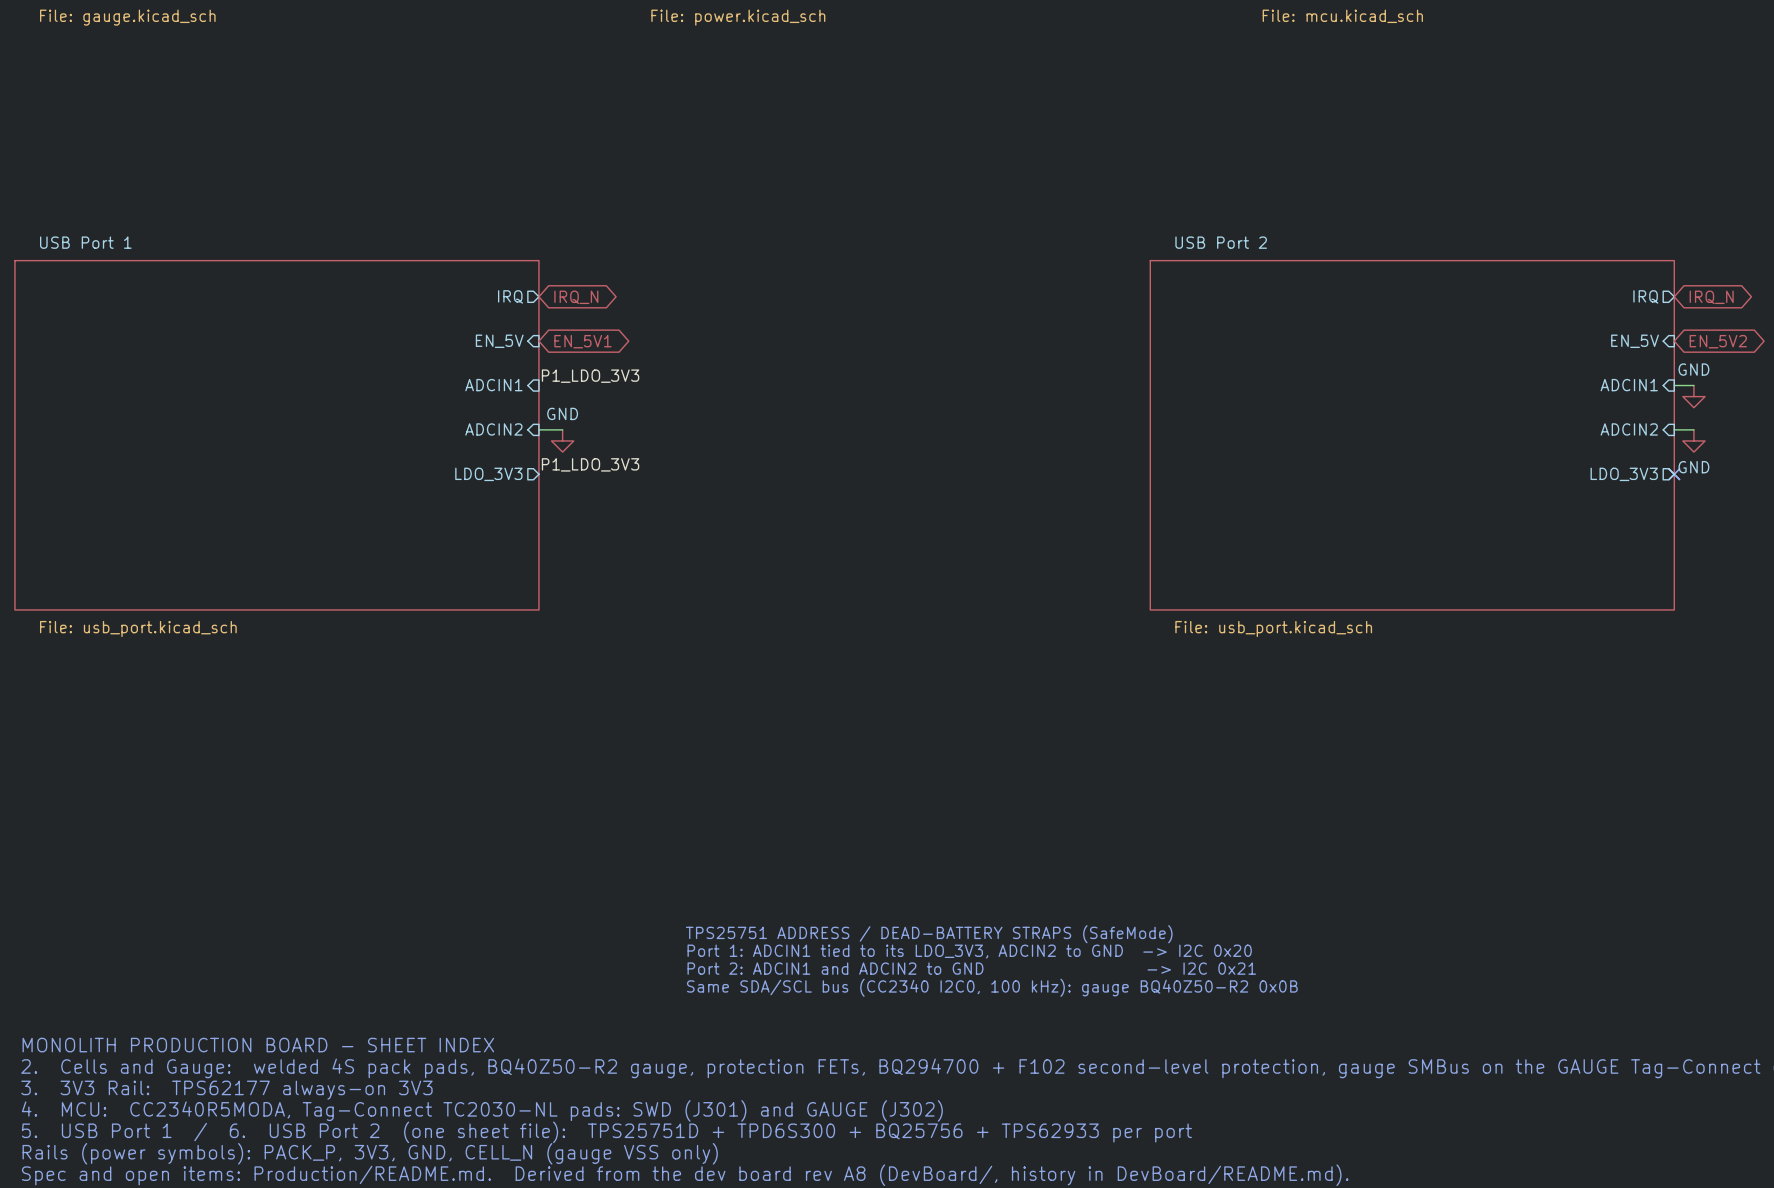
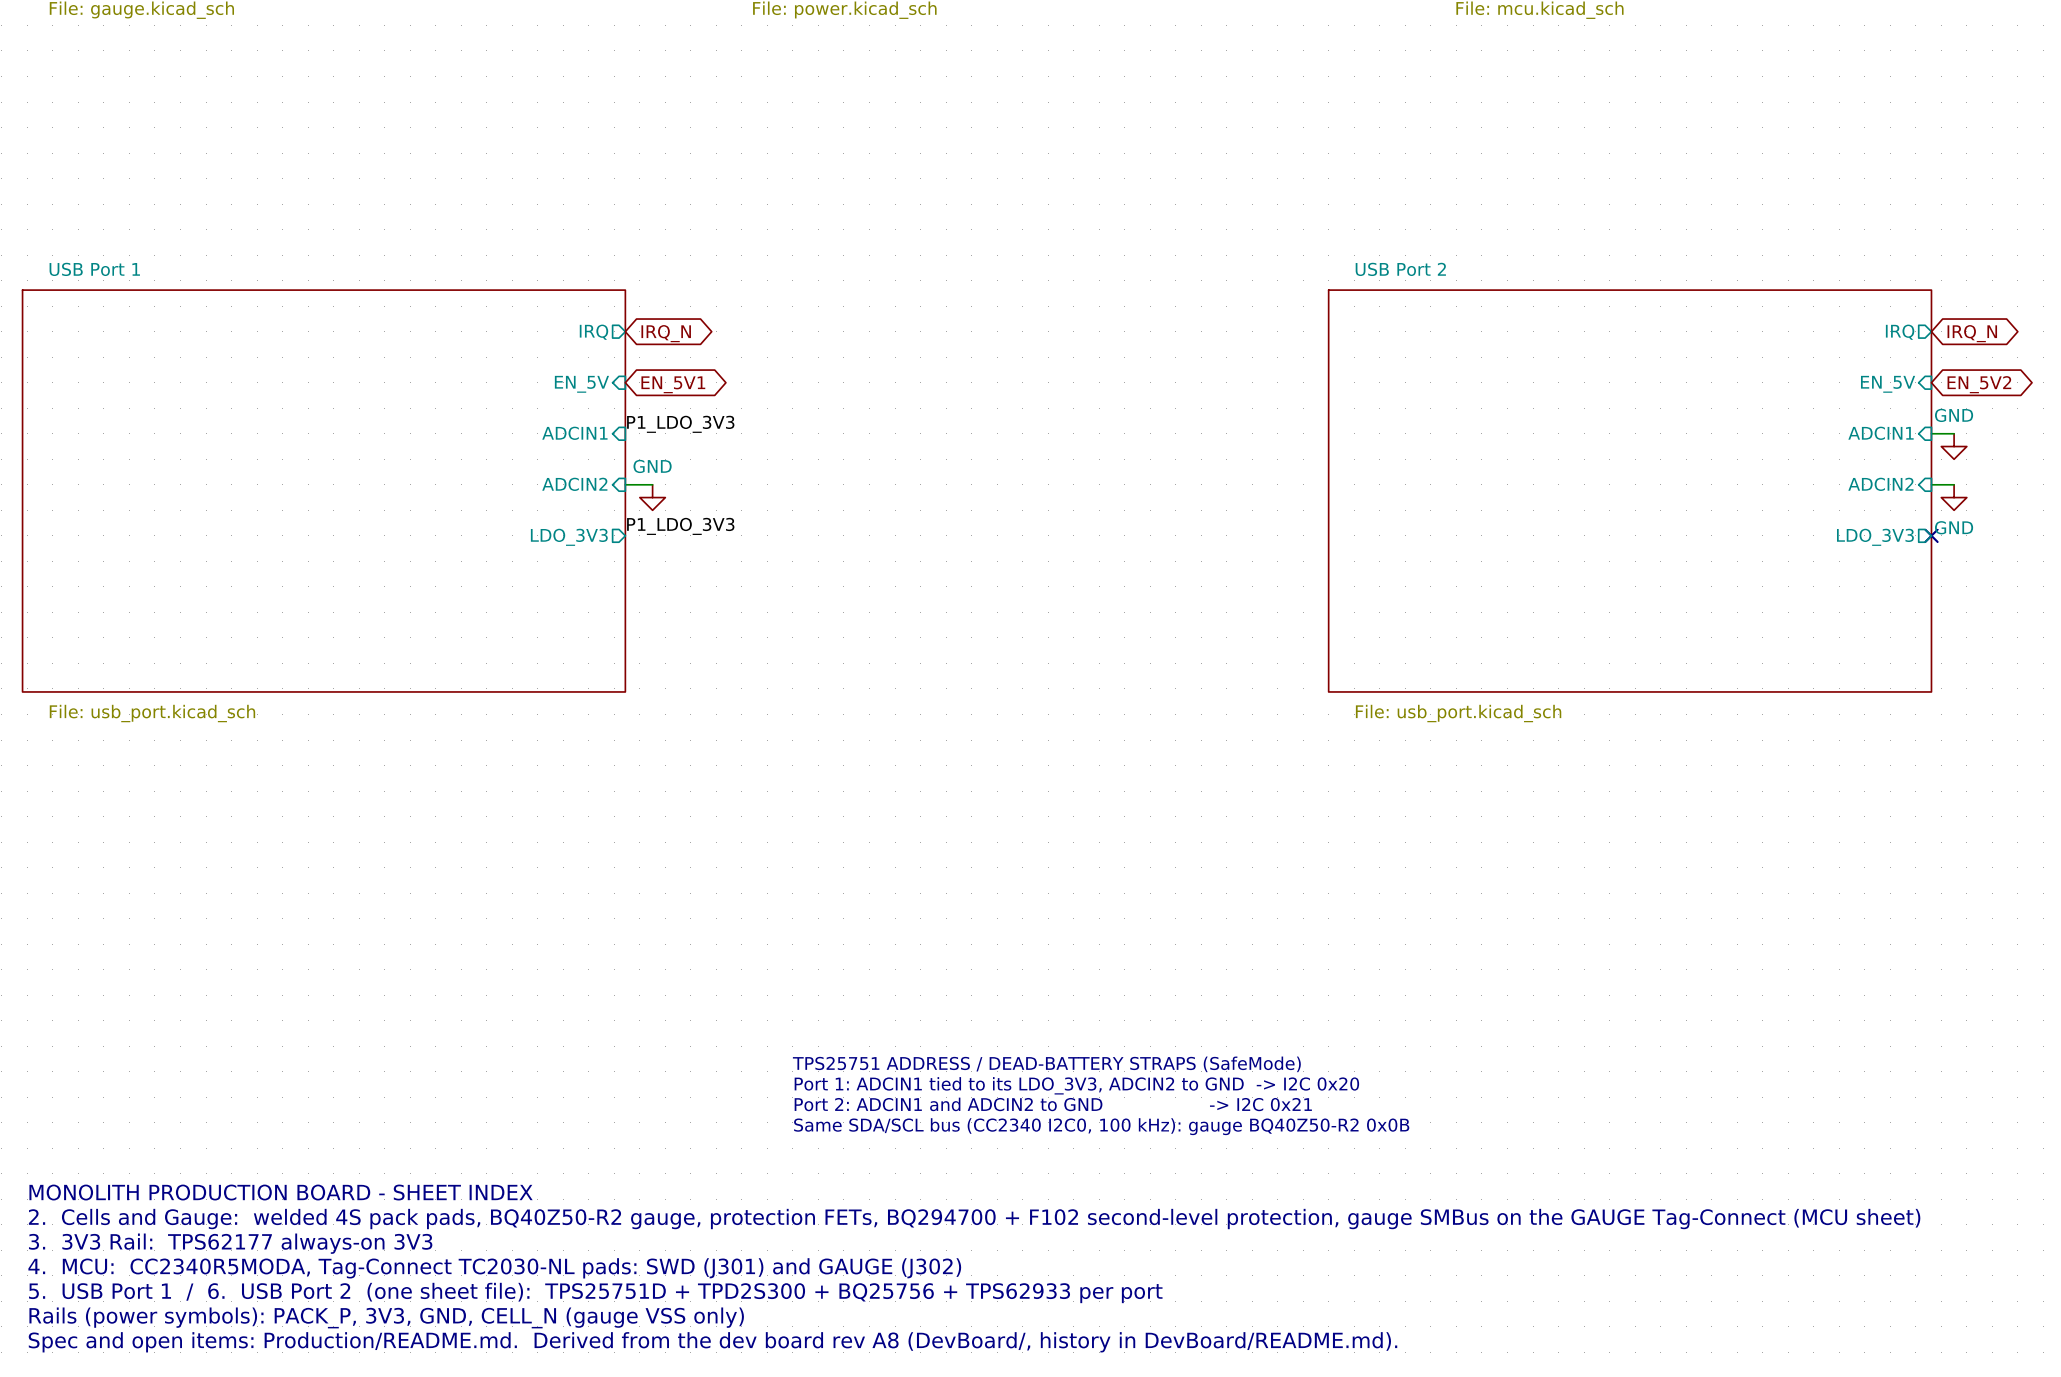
text: 5. USB Port 1 / 6. USB Port 2 (one sheet file): TPS25751D + TPD6S300 + BQ25756 + TPS62933 per port (606, 1132) -> 5. USB Port 1 / 6. USB Port 2 (one sheet file): TPS25751D + TPD2S300 + BQ25756 + TPS62933 per port (595, 1292)

